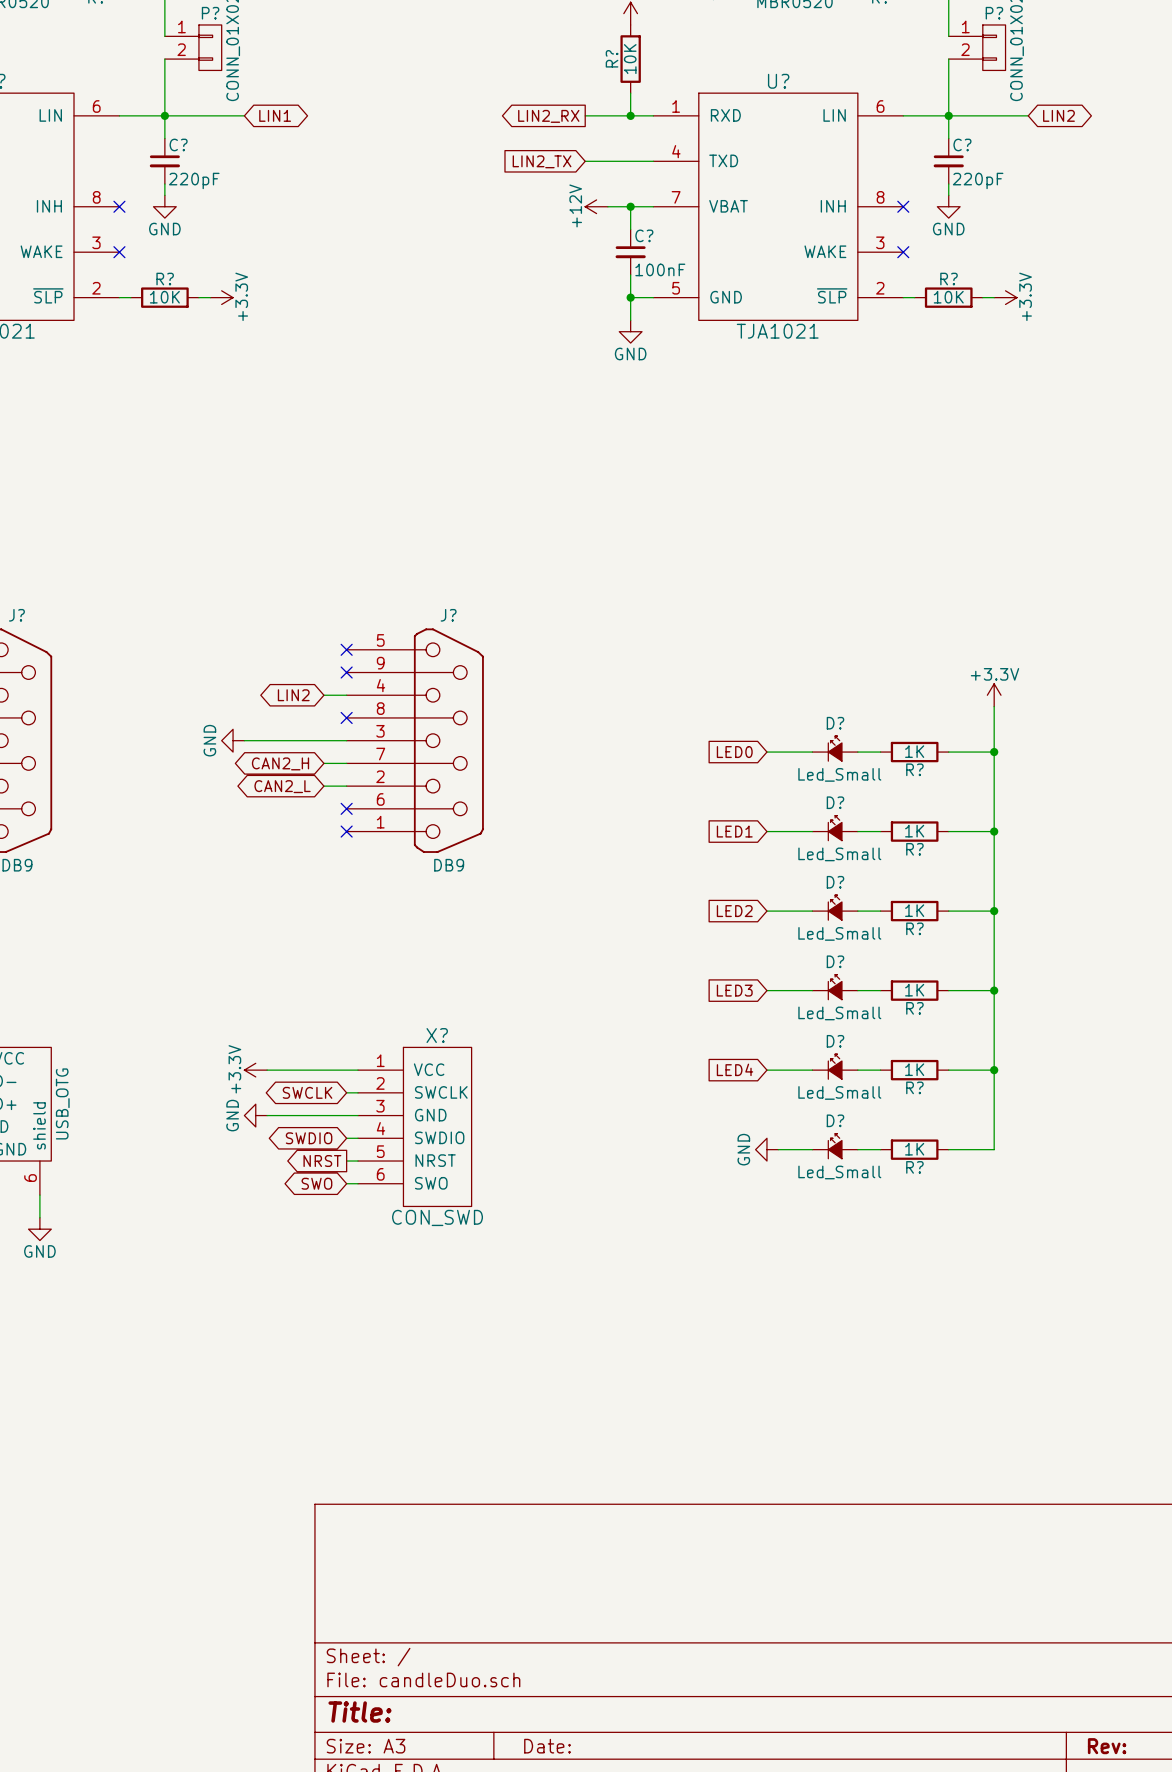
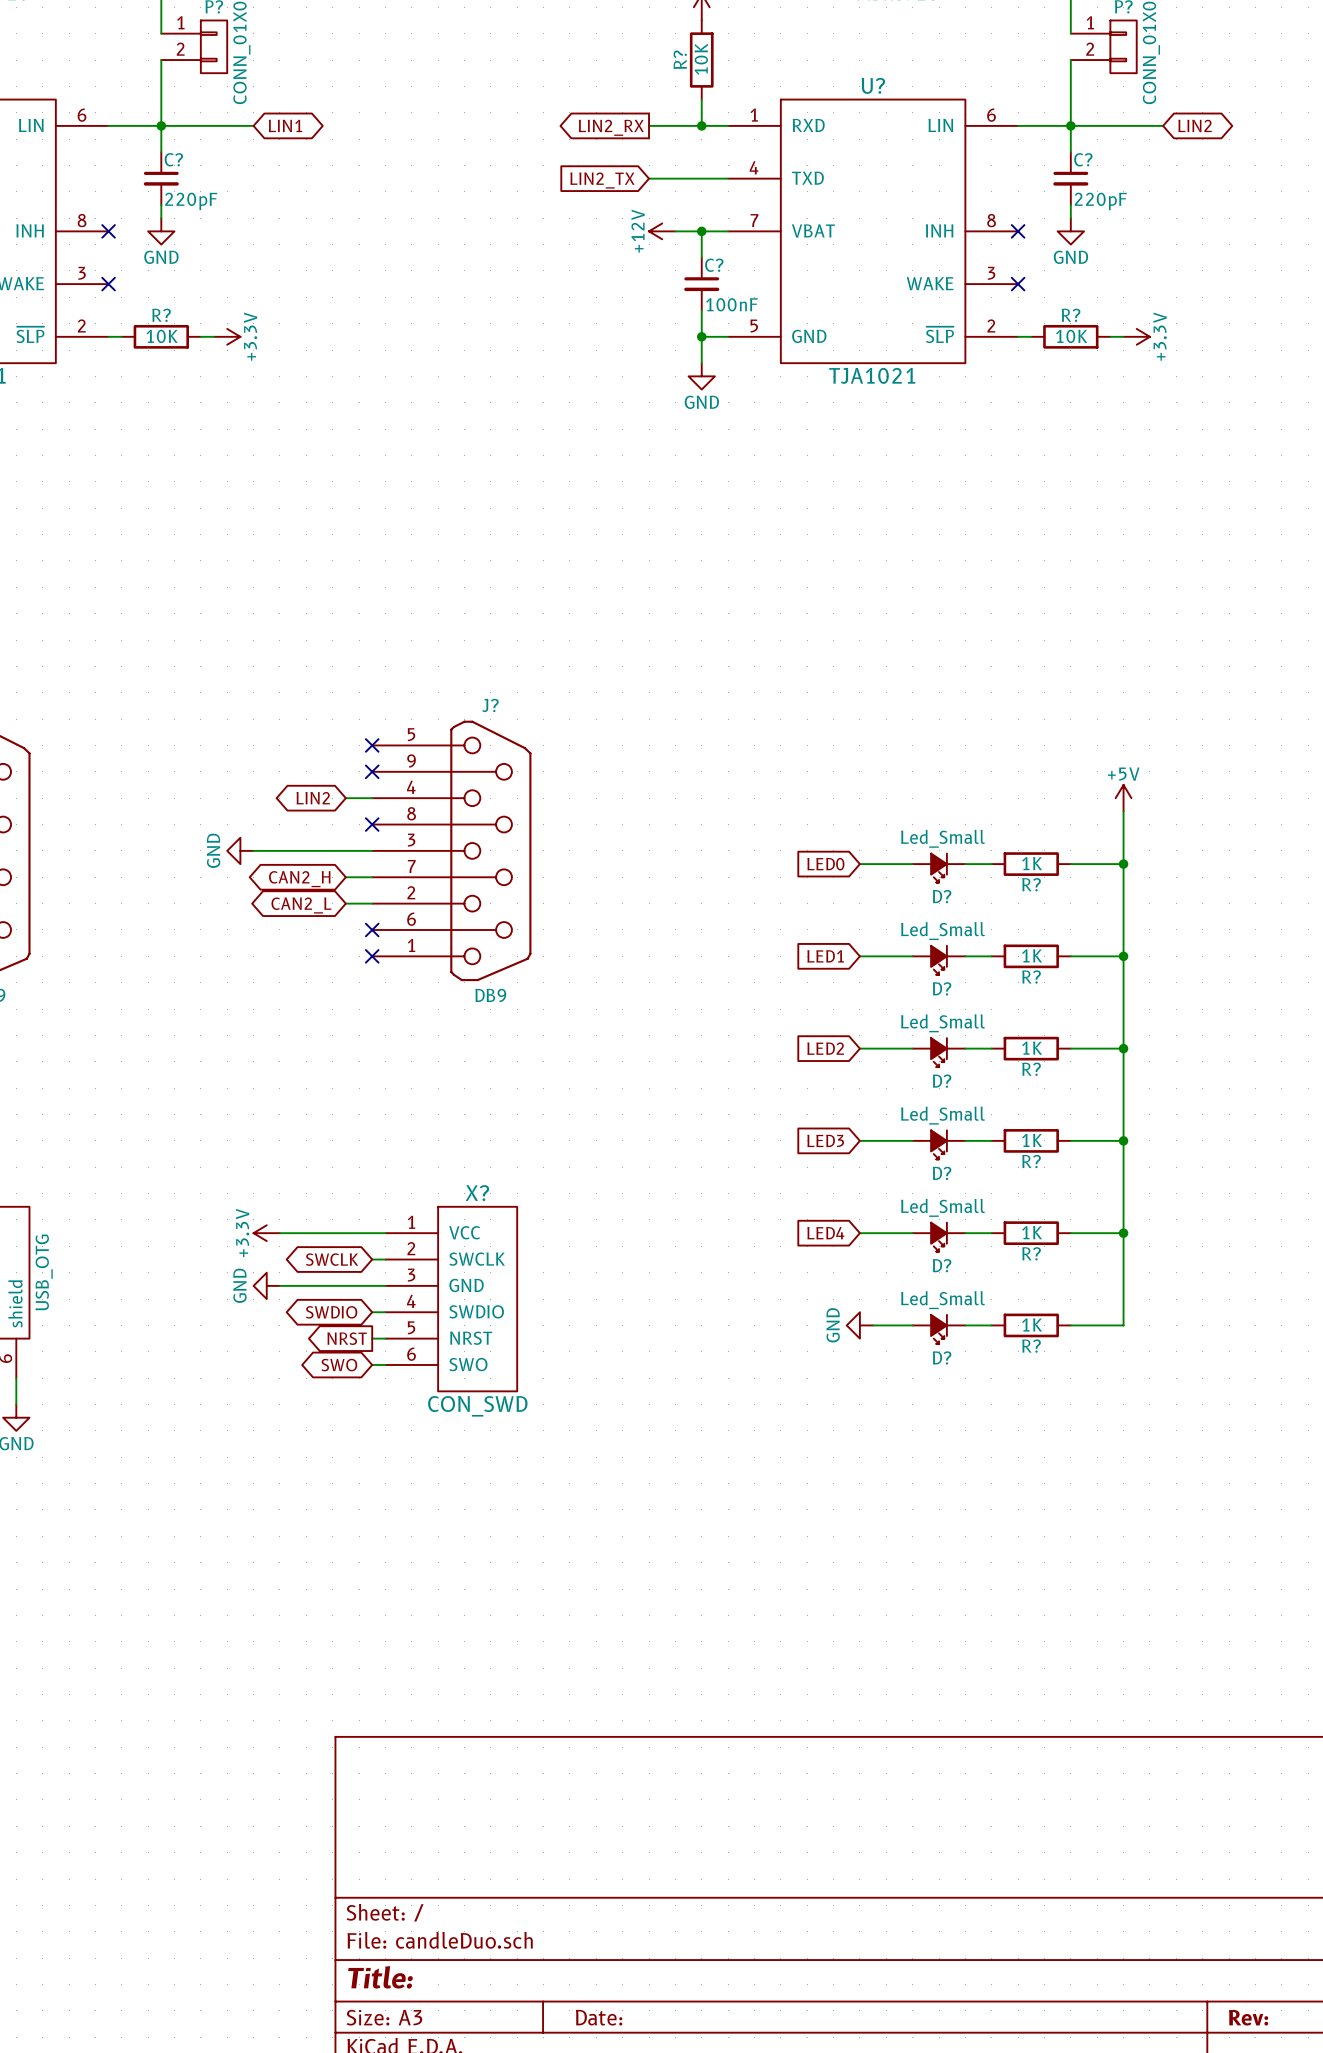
power symbol: +3.3V (994, 695) -> +5V (1123, 798)
D? rotation: 0° (835, 748) -> 180° (939, 868)
D? rotation: 0° (835, 828) -> 180° (939, 960)
D? rotation: 0° (835, 907) -> 180° (939, 1052)
D? rotation: 0° (835, 987) -> 180° (939, 1144)
D? rotation: 0° (835, 1066) -> 180° (939, 1237)
D? rotation: 0° (835, 1146) -> 180° (939, 1329)

